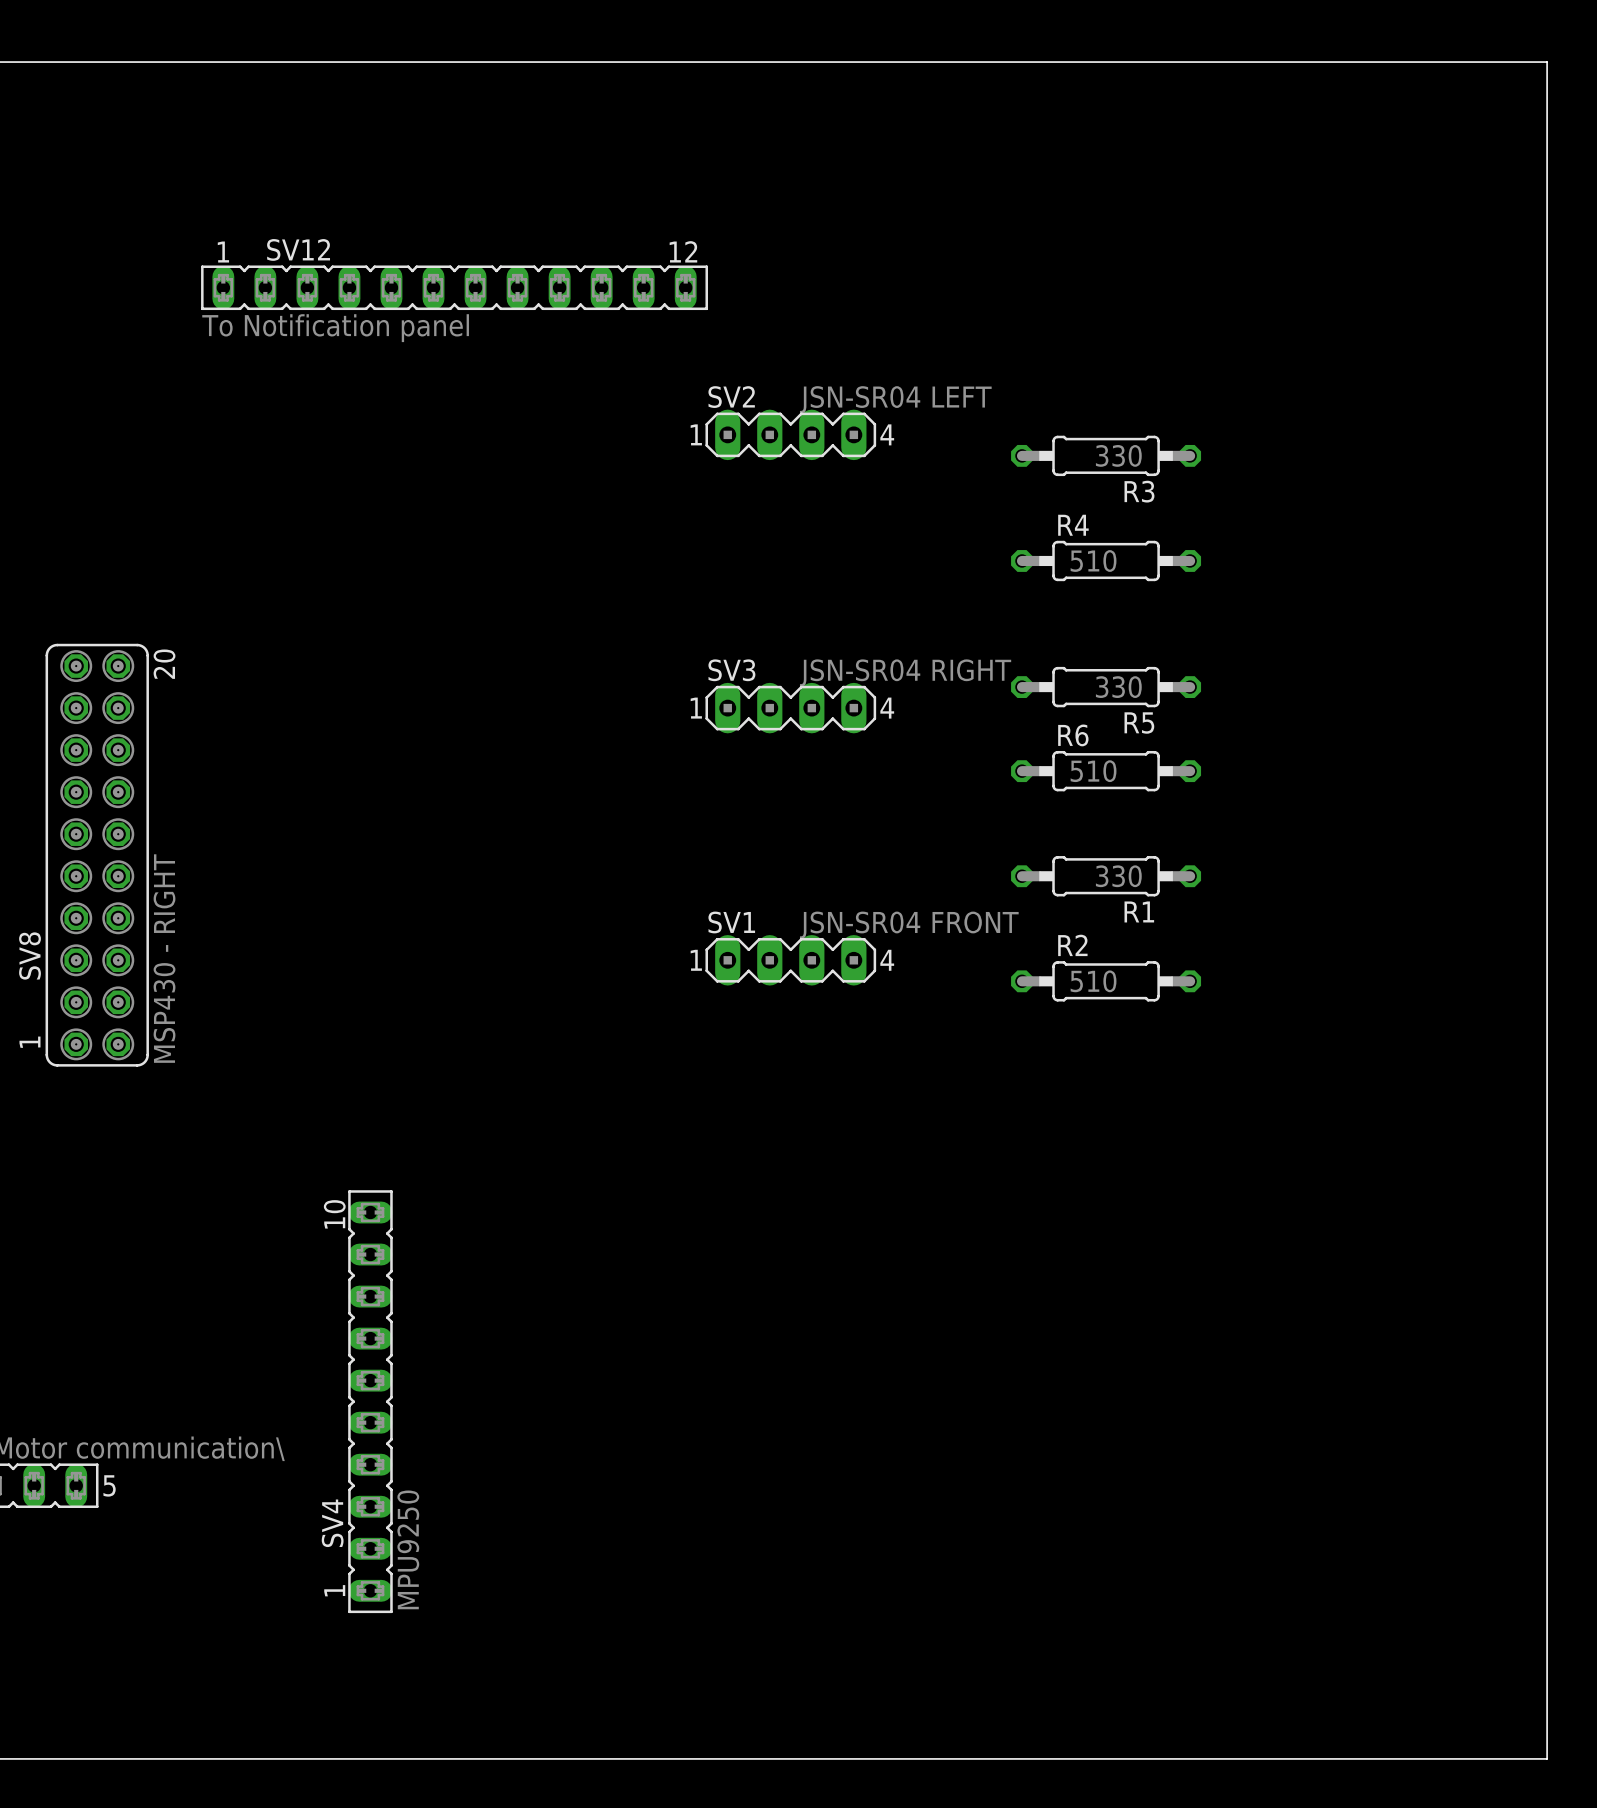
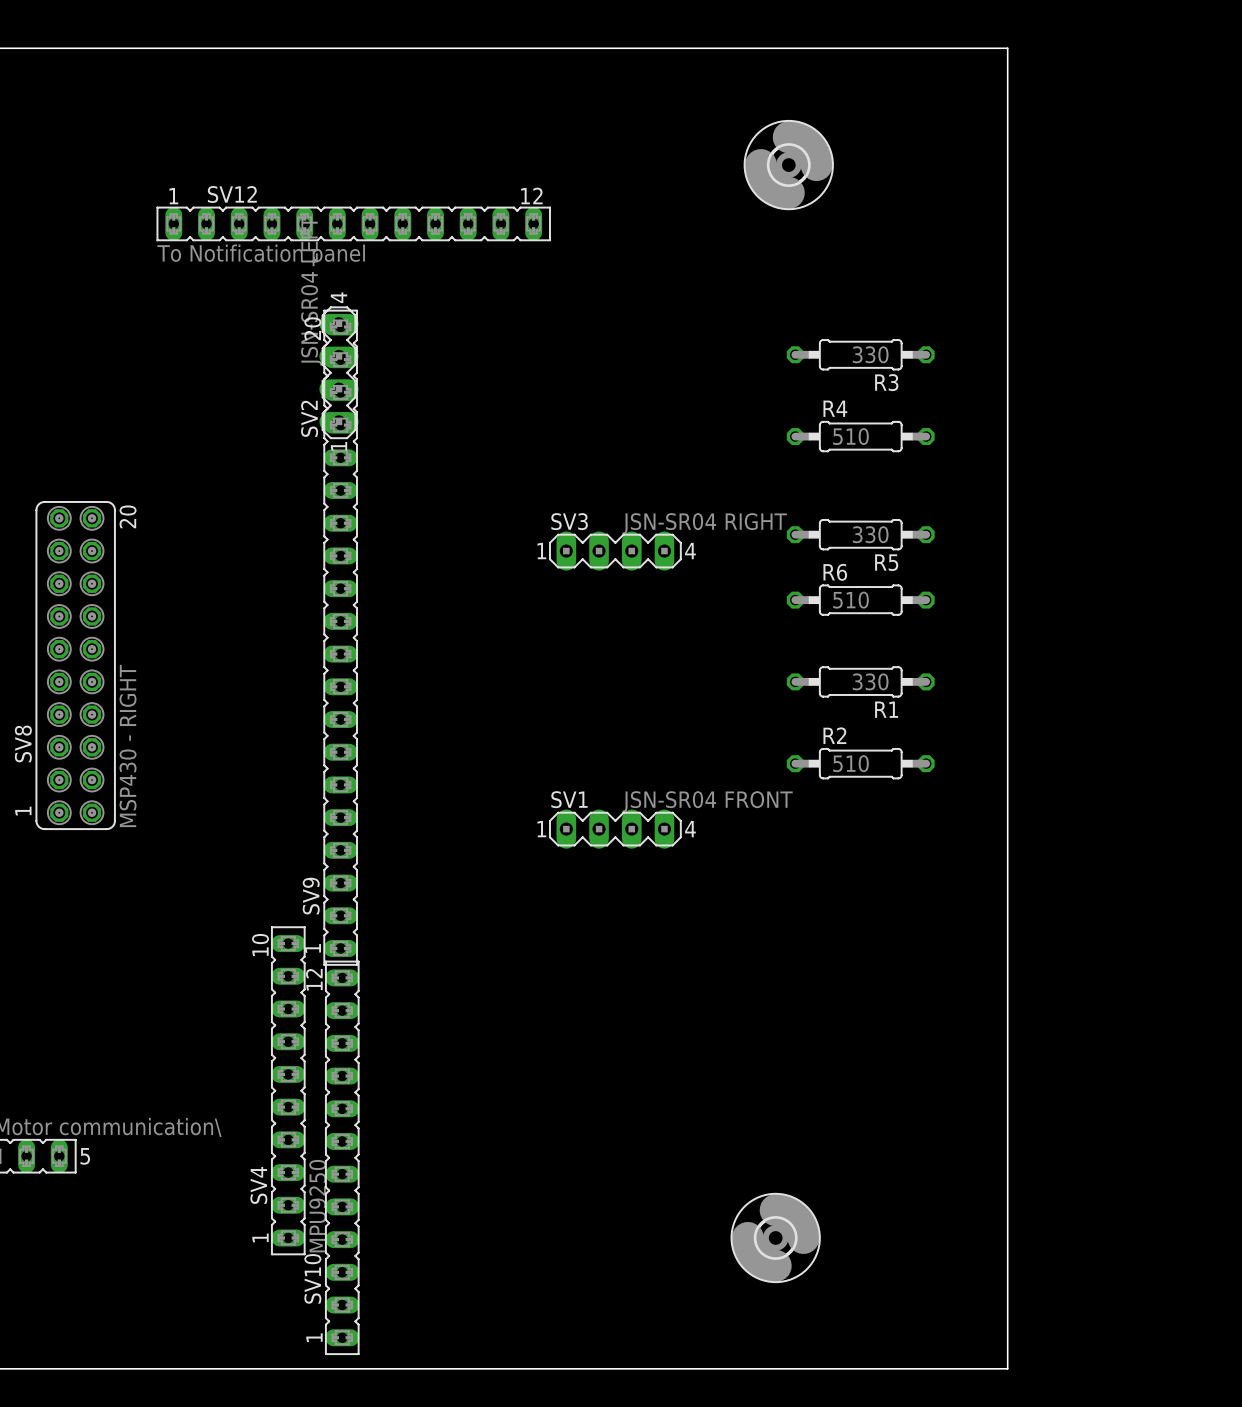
board edge: (1294, 62) (1547, 62) (1547, 1758) (1294, 1758) -> (1007, 48) (1007, 1368)
part: none -> (788, 165)
SV2 rotation: 0° (790, 434) -> 90° counterclockwise (339, 372)
SV2 position: (790, 434) -> (339, 372)
SV9: none -> (340, 637)
SV1 position: (790, 960) -> (615, 829)
SV10: none -> (342, 1157)
part: none -> (775, 1237)

